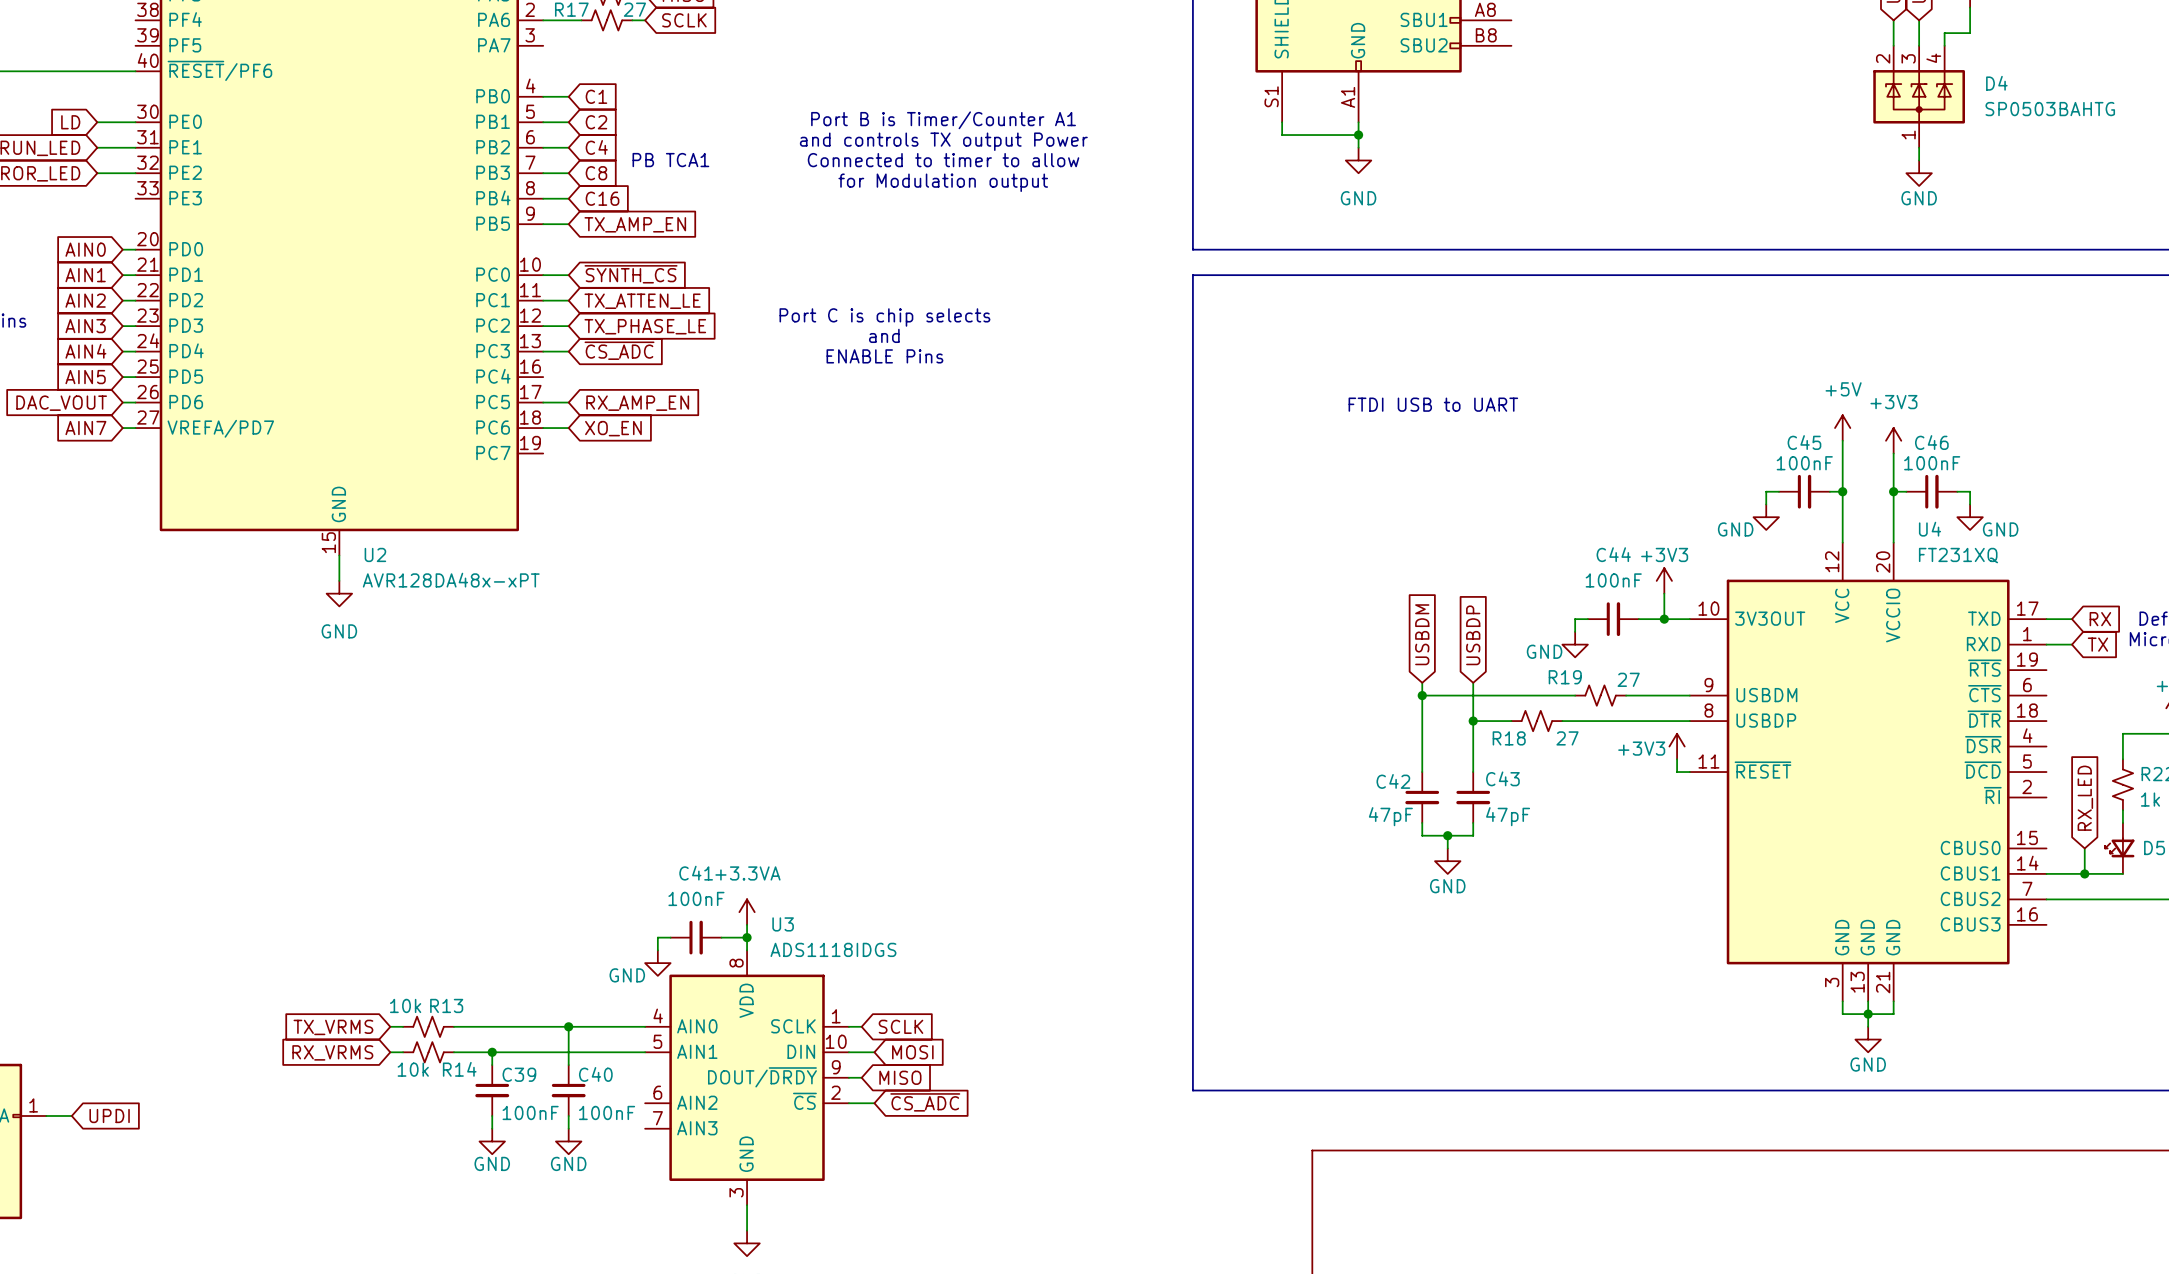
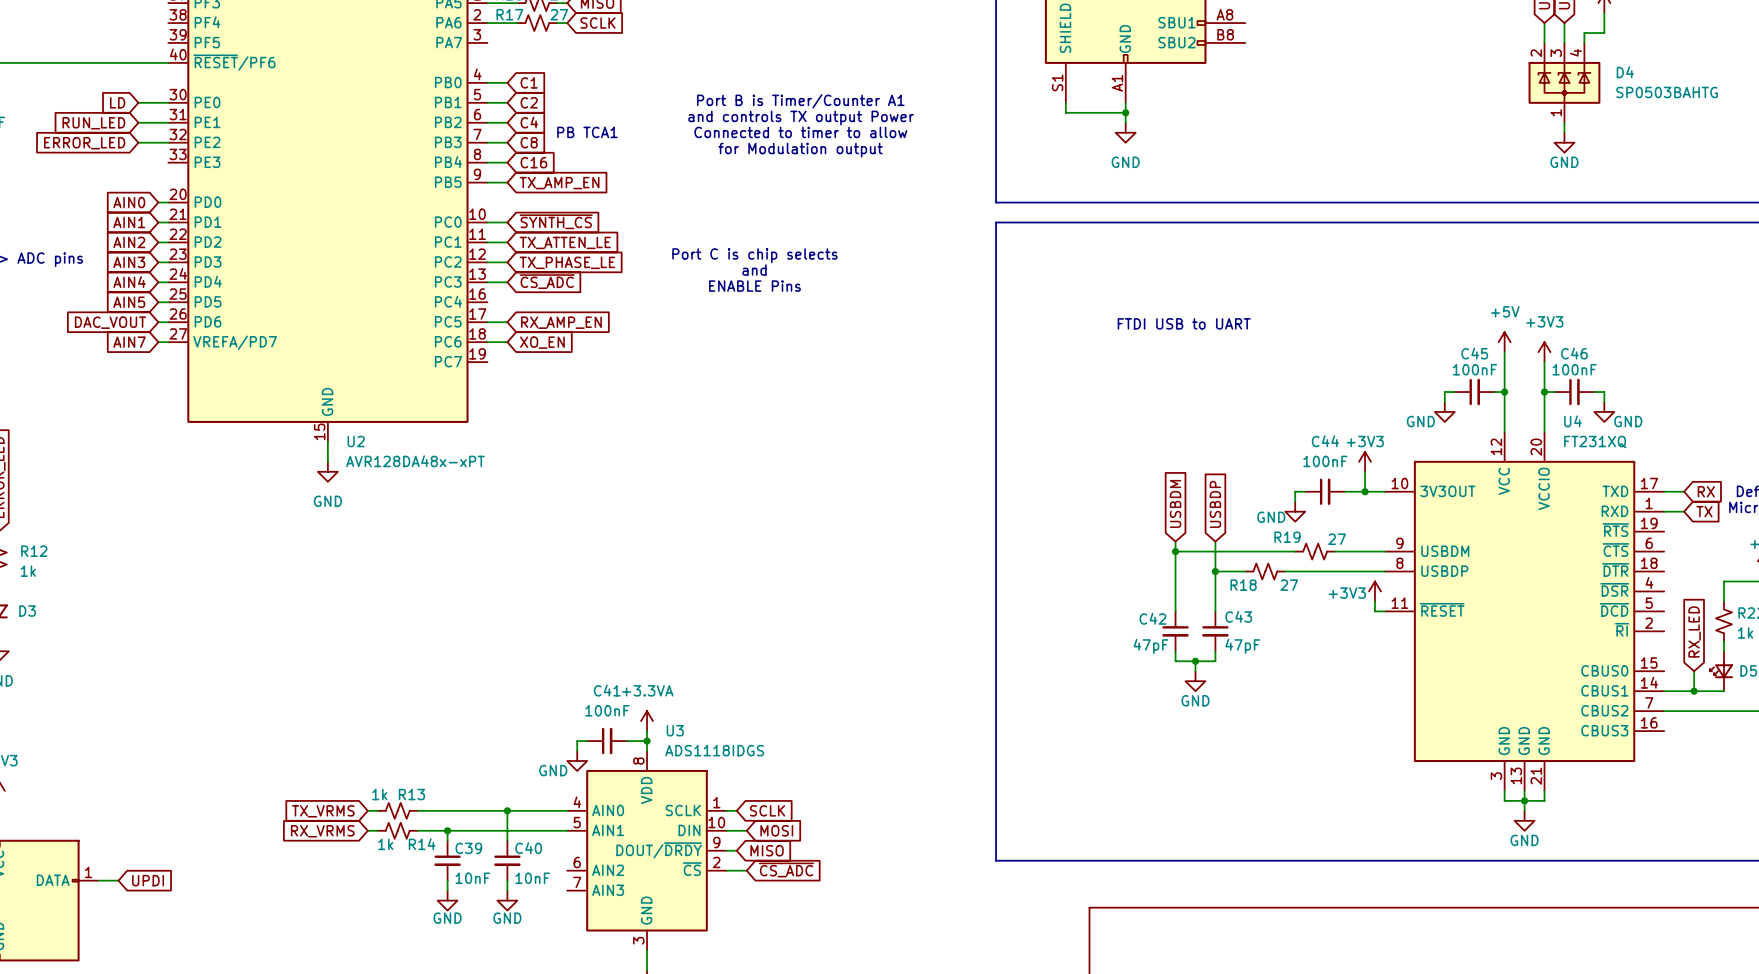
R13 value: 10k (405, 1005) -> 1k (379, 794)
R14 value: 10k (413, 1069) -> 1k (385, 844)
C39 value: 100nF (530, 1112) -> 10nF (472, 878)
C40 value: 100nF (607, 1112) -> 10nF (532, 878)

